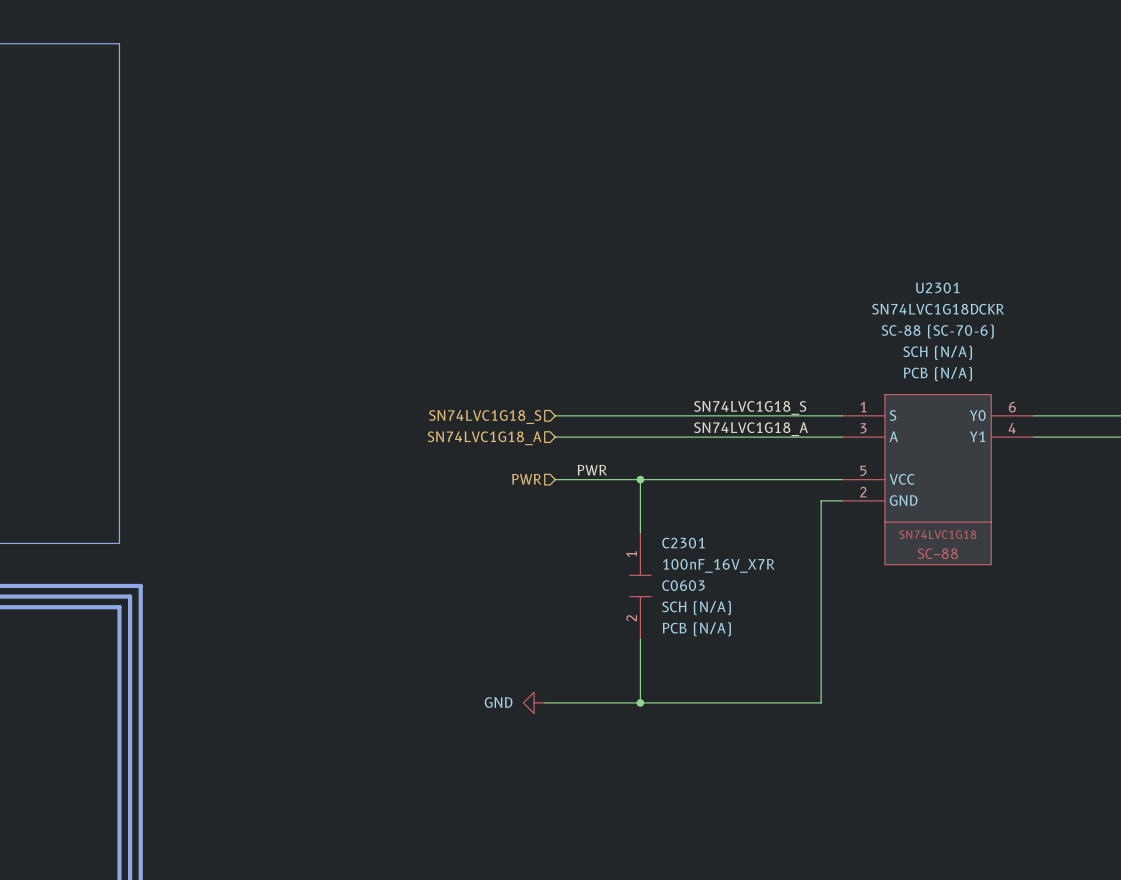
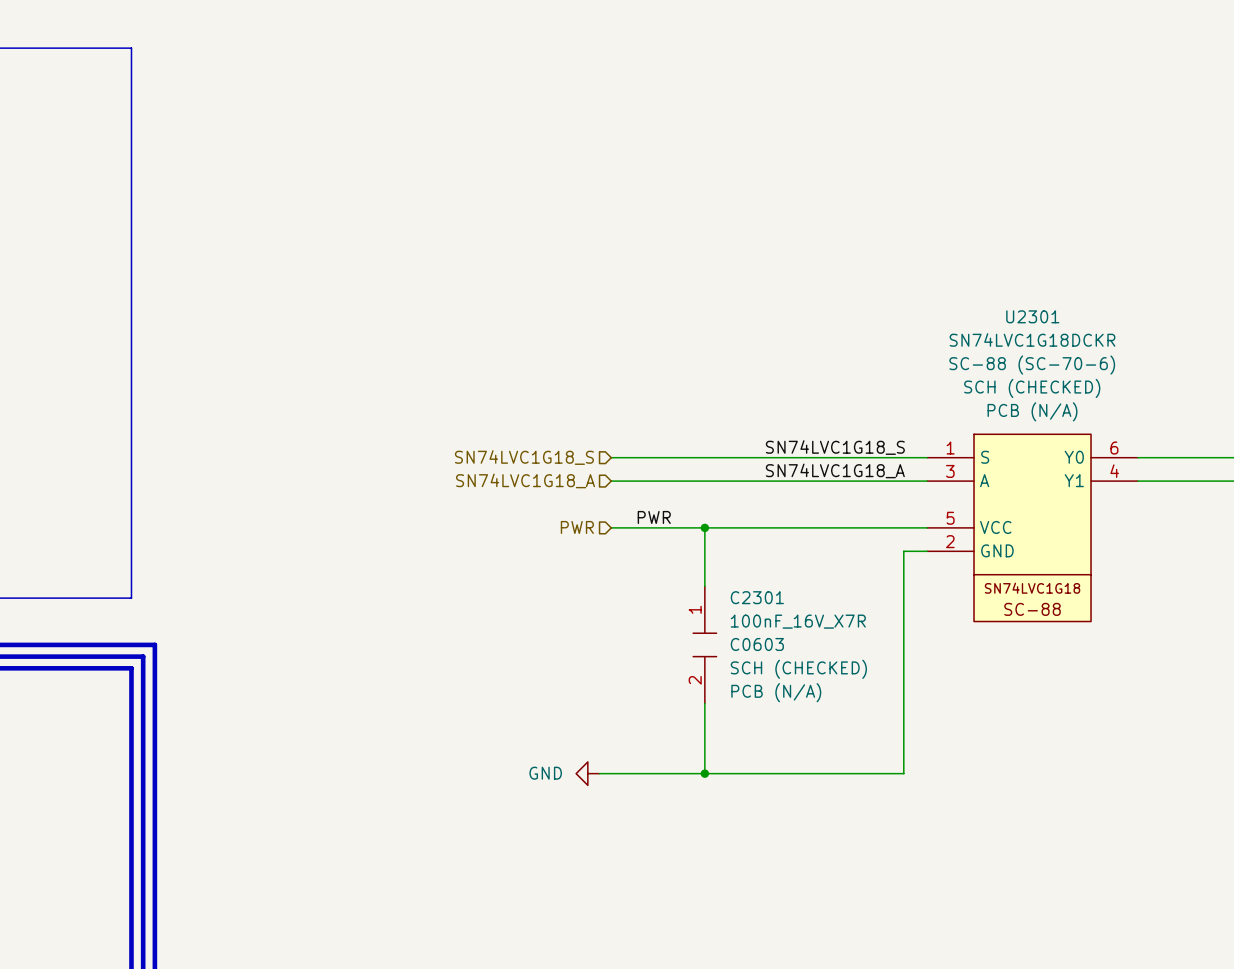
U2301 text: SCH (N/A) (937, 352) -> SCH (CHECKED) (1032, 388)
C2301 text: SCH (N/A) (696, 608) -> SCH (CHECKED) (798, 669)

